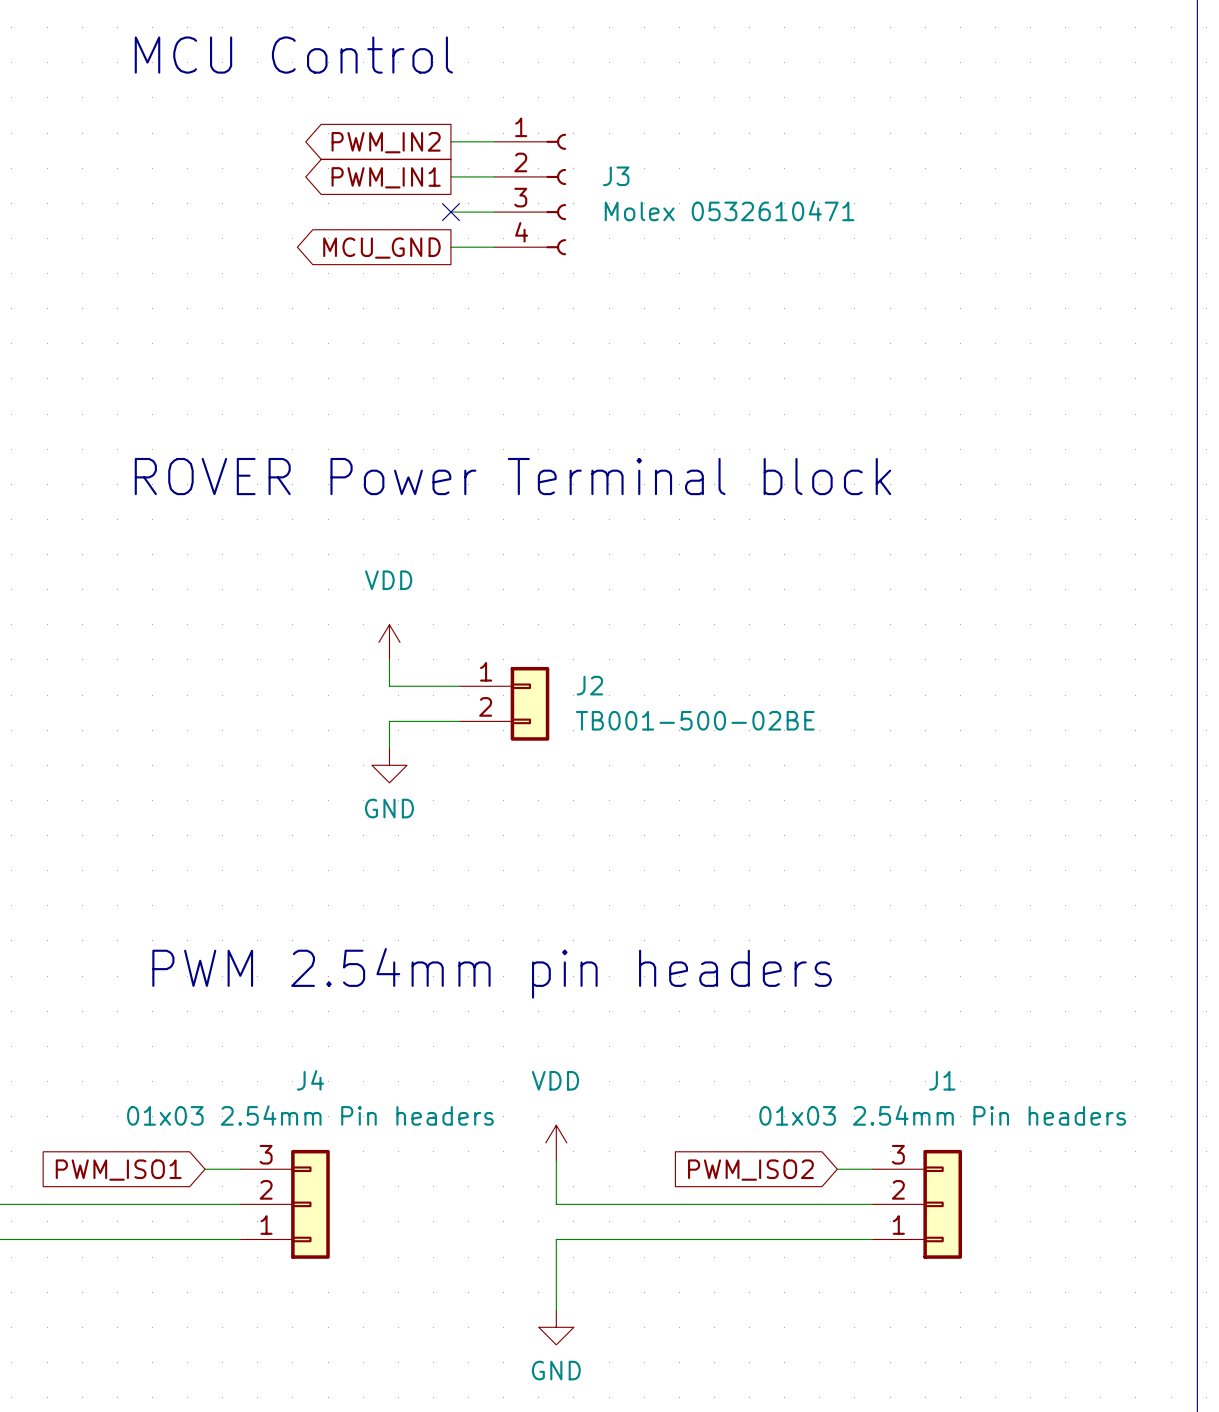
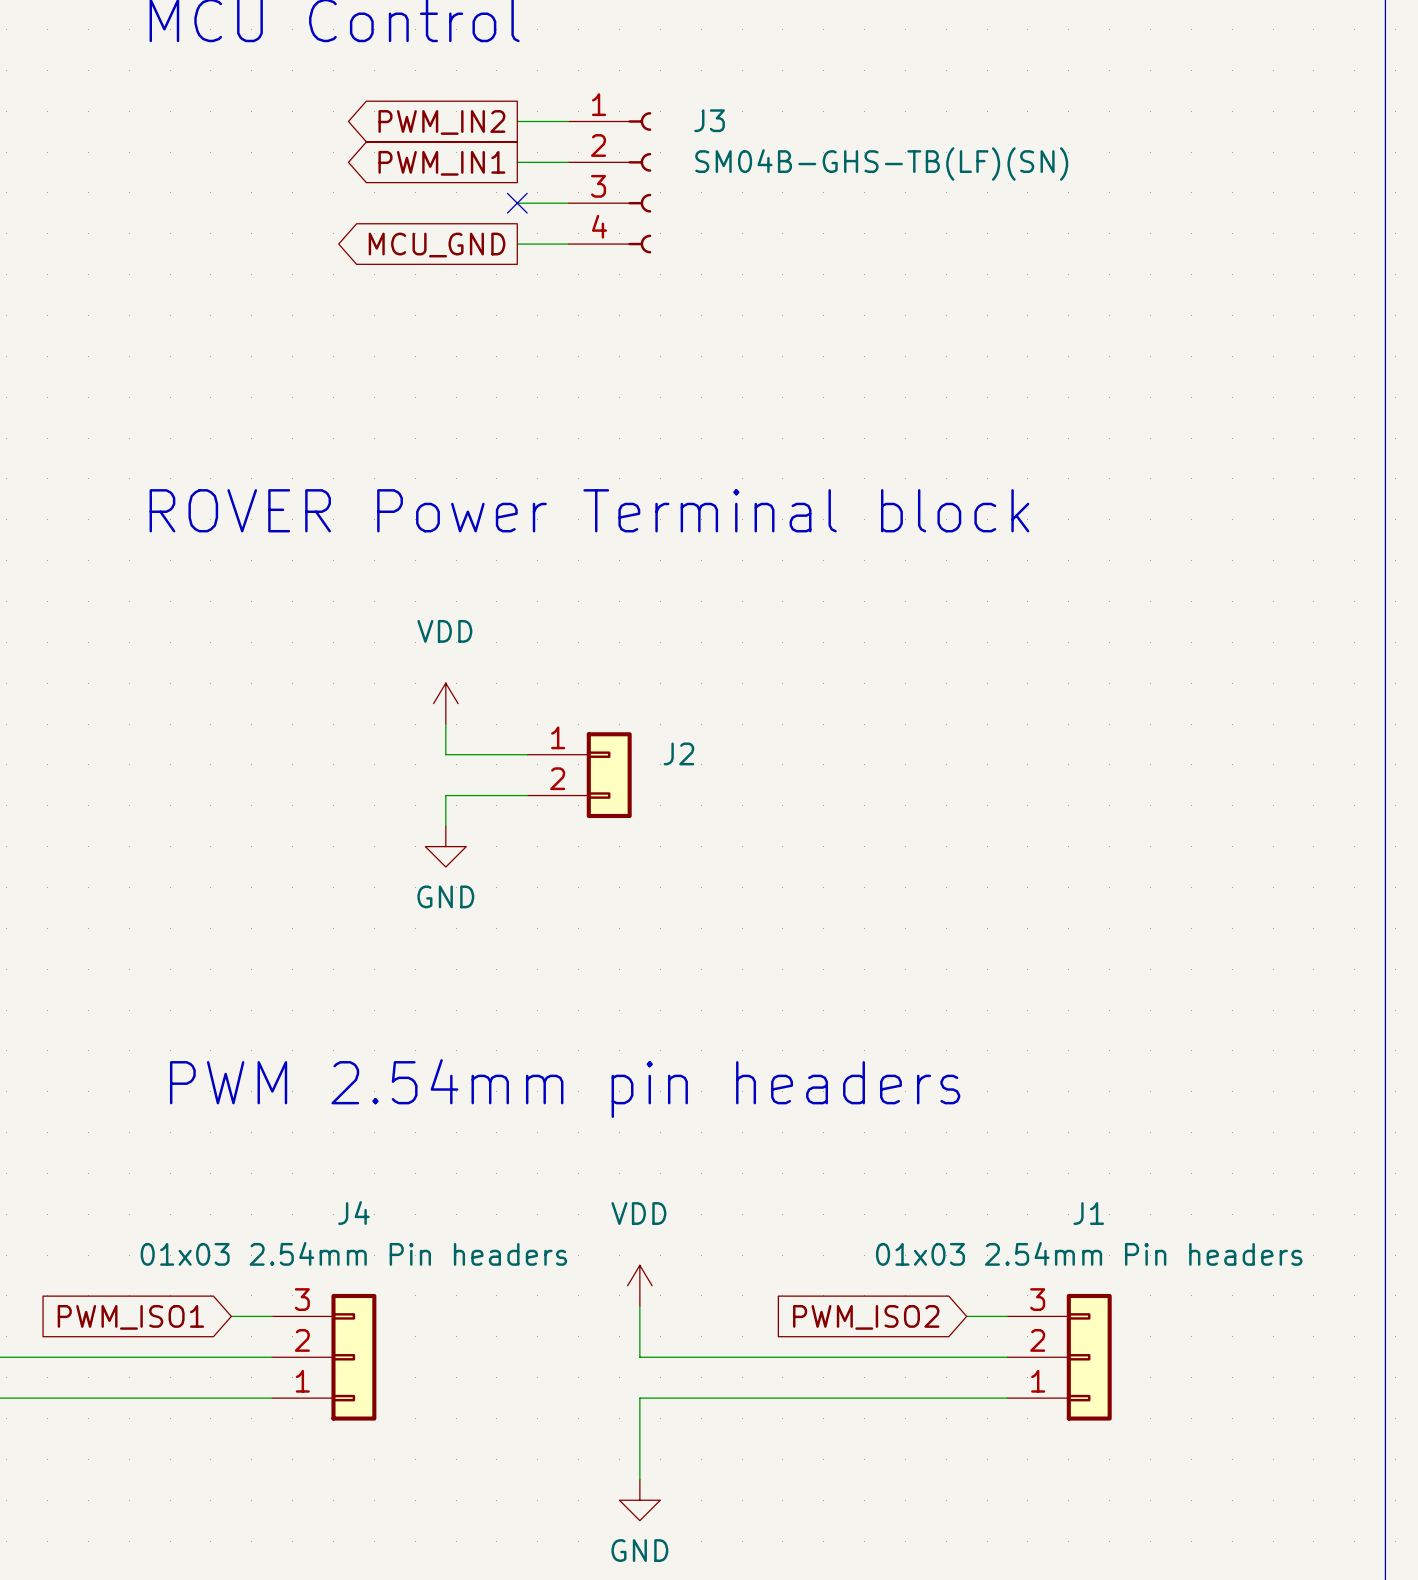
J3 name position: J3 (616, 176) -> J3 (709, 120)
J3 value: Molex 0532610471 (729, 211) -> SM04B-GHS-TB(LF)(SN) (881, 164)
J2 value: TB001-500-02BE (695, 720) -> none

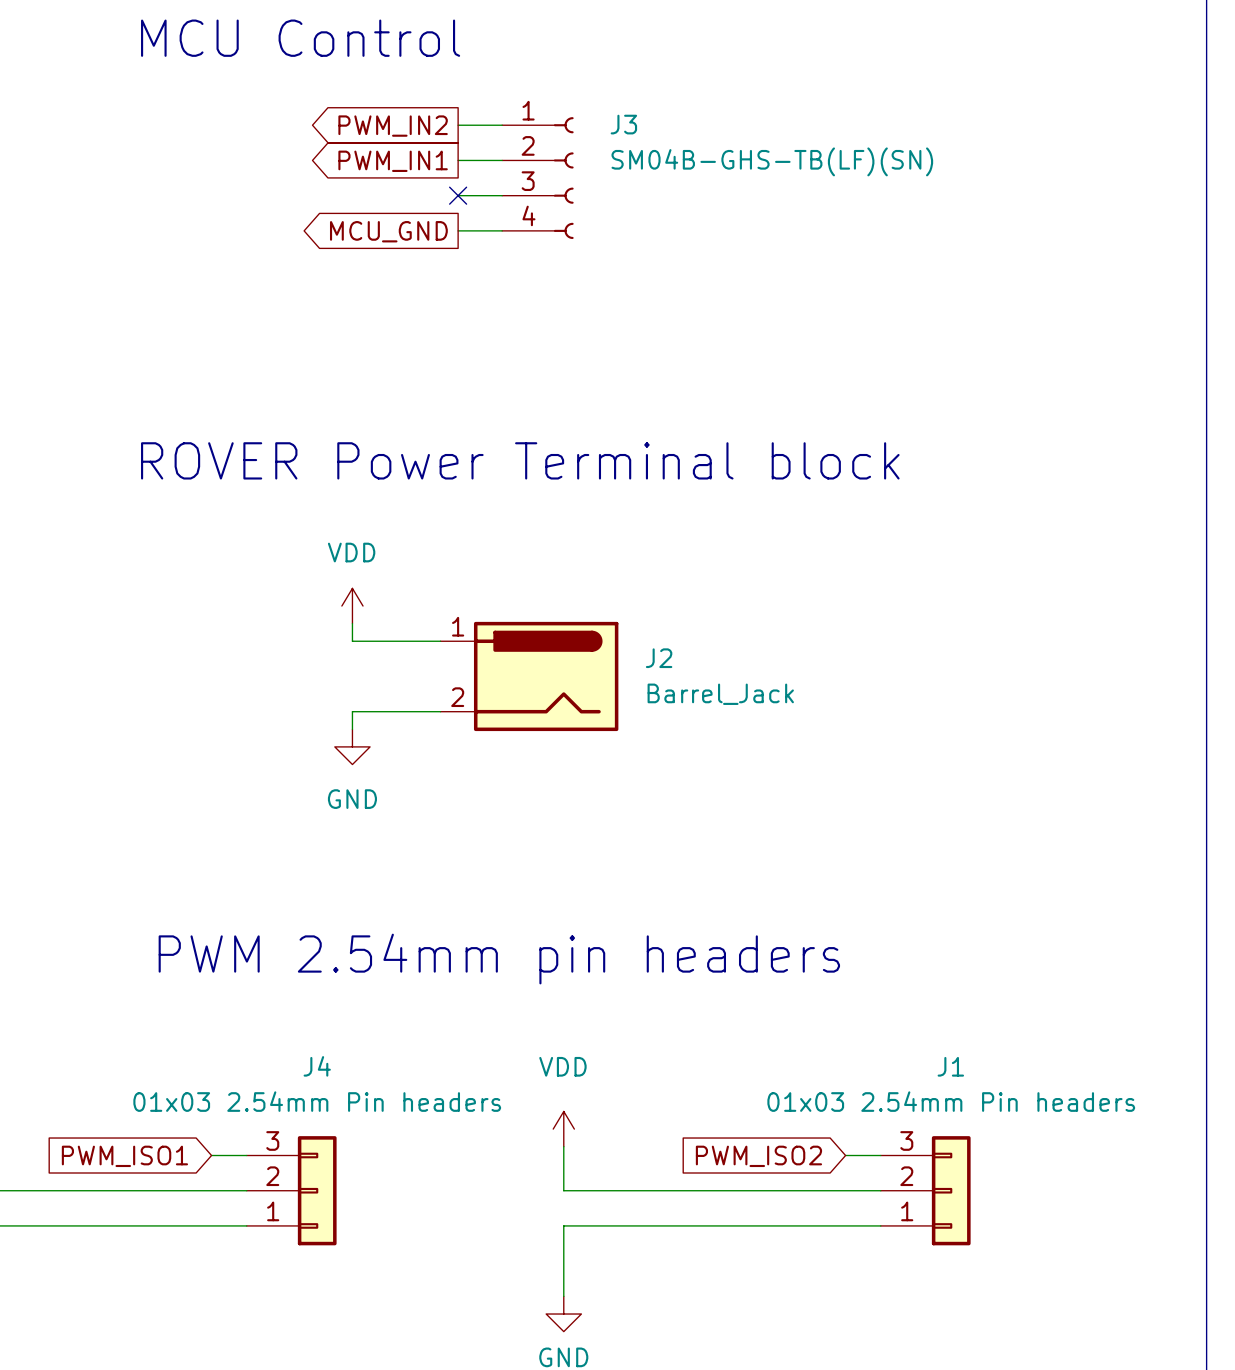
power symbol text position: VDD (444, 631) -> VDD (351, 552)
wire: none -> (352, 623) (352, 641) (440, 641)
power symbol position: VDD (445, 703) -> VDD (352, 606)
wire: (445, 724) (445, 754) (527, 754) -> none
J2 symbol: [527, 732, 632, 819] -> [440, 621, 619, 732]
J2 name position: J2 (678, 753) -> J2 (659, 658)
J2 value: none -> Barrel_Jack (720, 694)
wire: (527, 795) (445, 795) (445, 826) -> none
wire: none -> (440, 711) (352, 711) (352, 729)
power symbol position: GND (445, 846) -> GND (352, 746)
power symbol text position: GND (445, 896) -> GND (352, 799)

